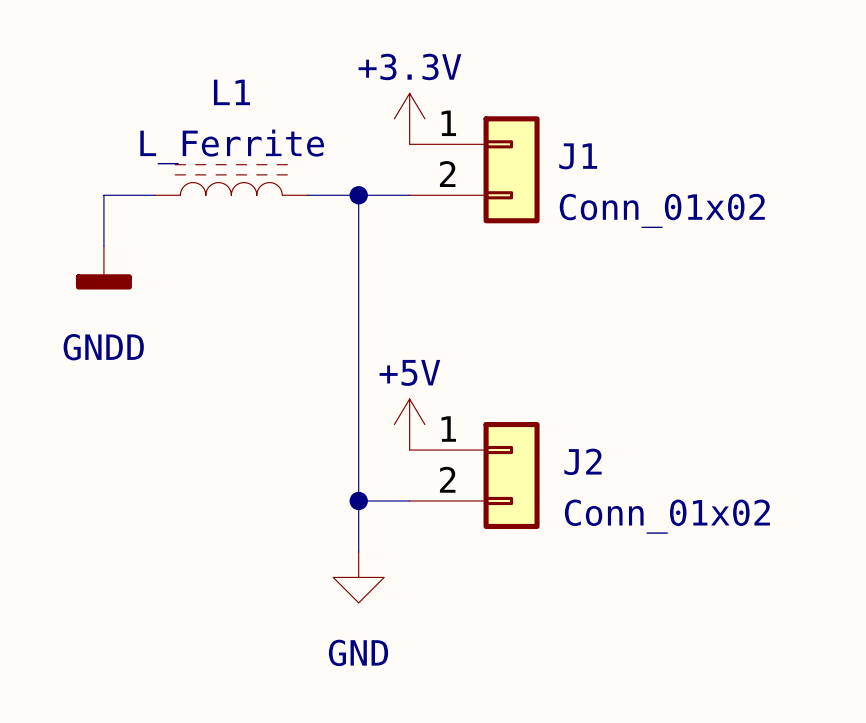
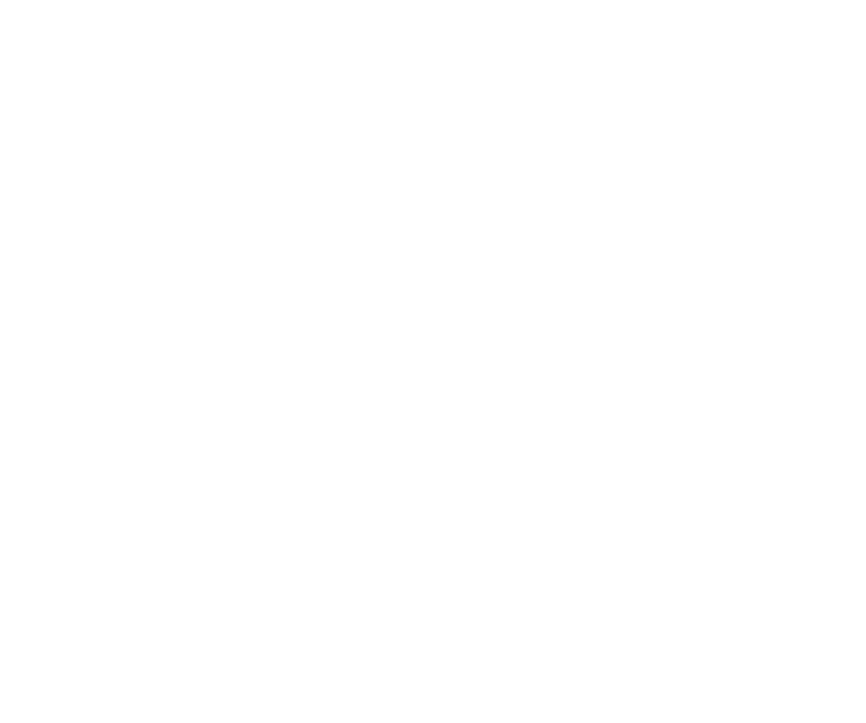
power symbol: +3.3V (409, 118) -> none
J1: Conn_01x02 (474, 169) -> none
L1: L_Ferrite (231, 179) -> none
wire: (154, 195) (103, 195) (103, 246) -> none
wire: (307, 195) (409, 195) -> none
wire: (358, 195) (358, 551) -> none
junction: (358, 195) -> none
power symbol: GNDD (103, 267) -> none
power symbol: +5V (409, 424) -> none
J2: Conn_01x02 (474, 475) -> none
wire: (358, 500) (409, 500) -> none
junction: (358, 500) -> none
power symbol: GND (358, 577) -> none

